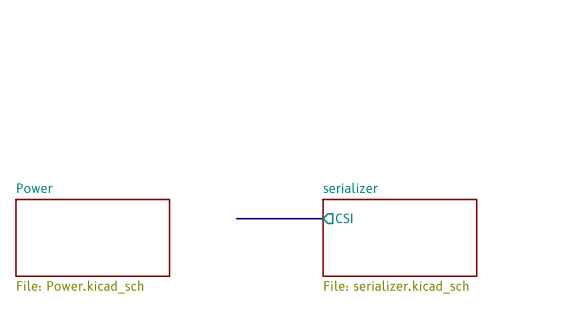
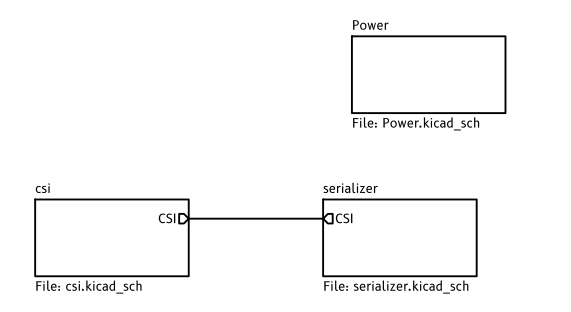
sheet Power: none -> File: Power.kicad_sch (428, 74)
hierarchical label: none -> CSI (167, 218)
bus: none -> (188, 218) (236, 218)
sheet Power: File: Power.kicad_sch (92, 237) -> none
sheet csi: none -> File: csi.kicad_sch (111, 237)

